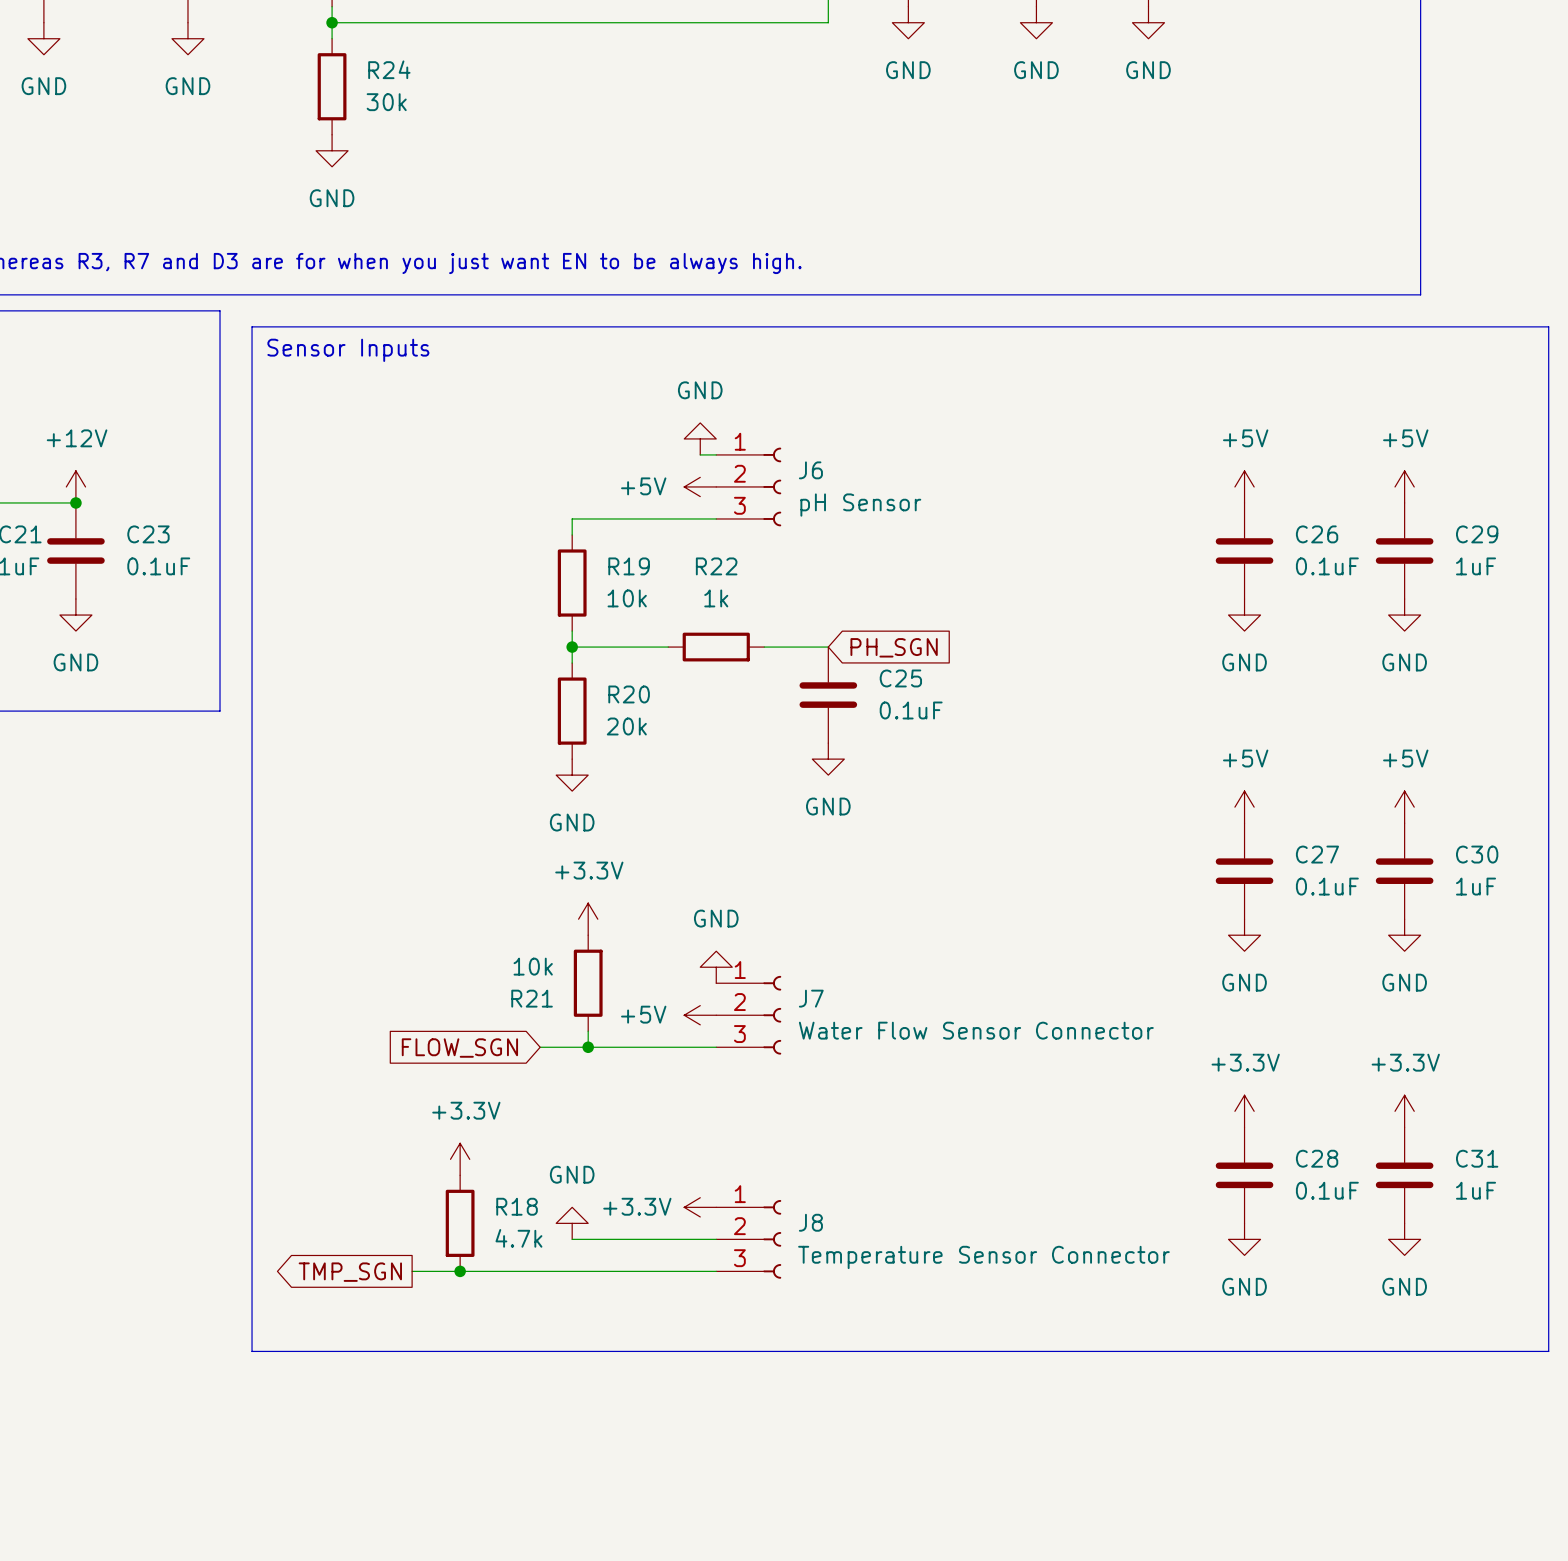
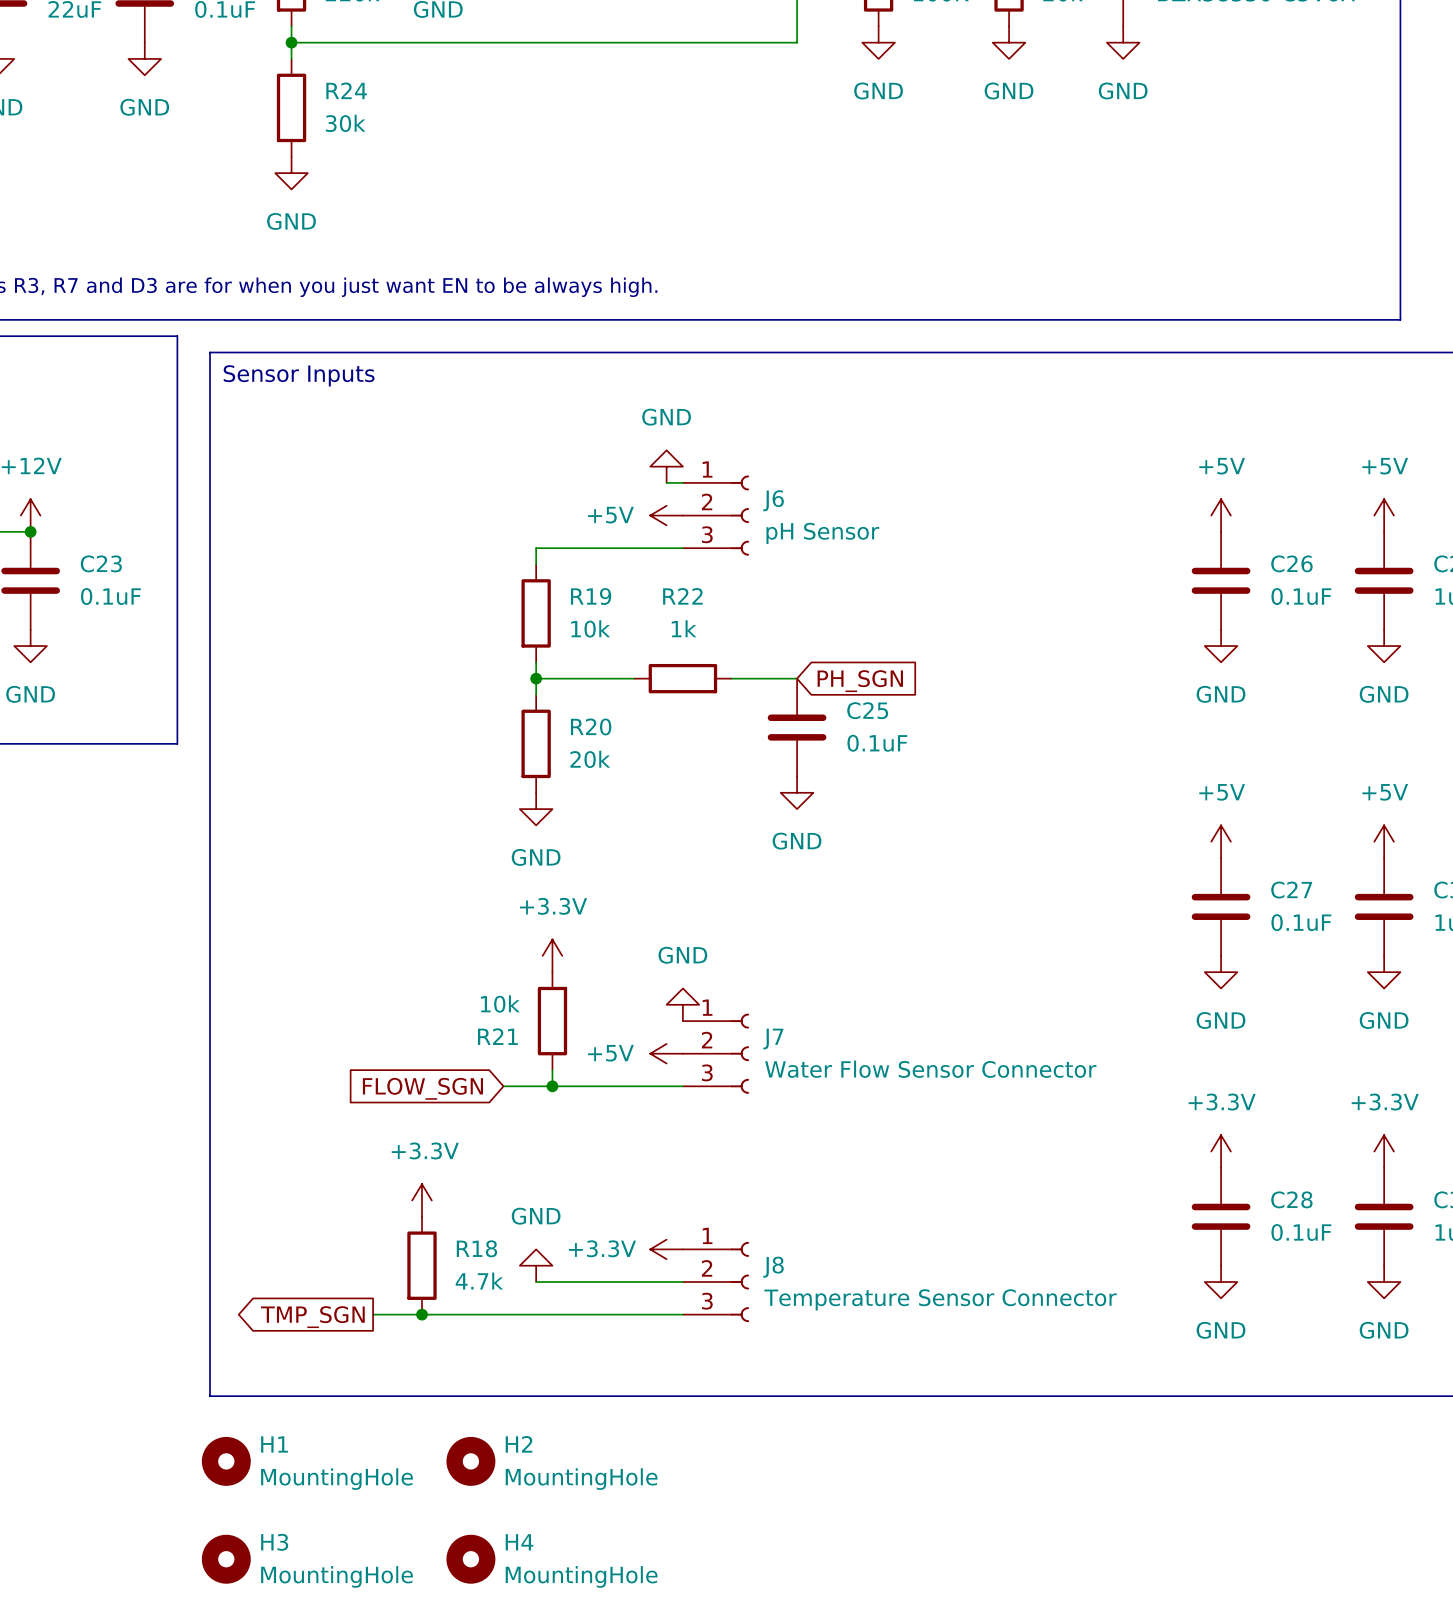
H1: none -> MountingHole (226, 1461)
H2: none -> MountingHole (470, 1461)
H3: none -> MountingHole (226, 1559)
H4: none -> MountingHole (470, 1559)

